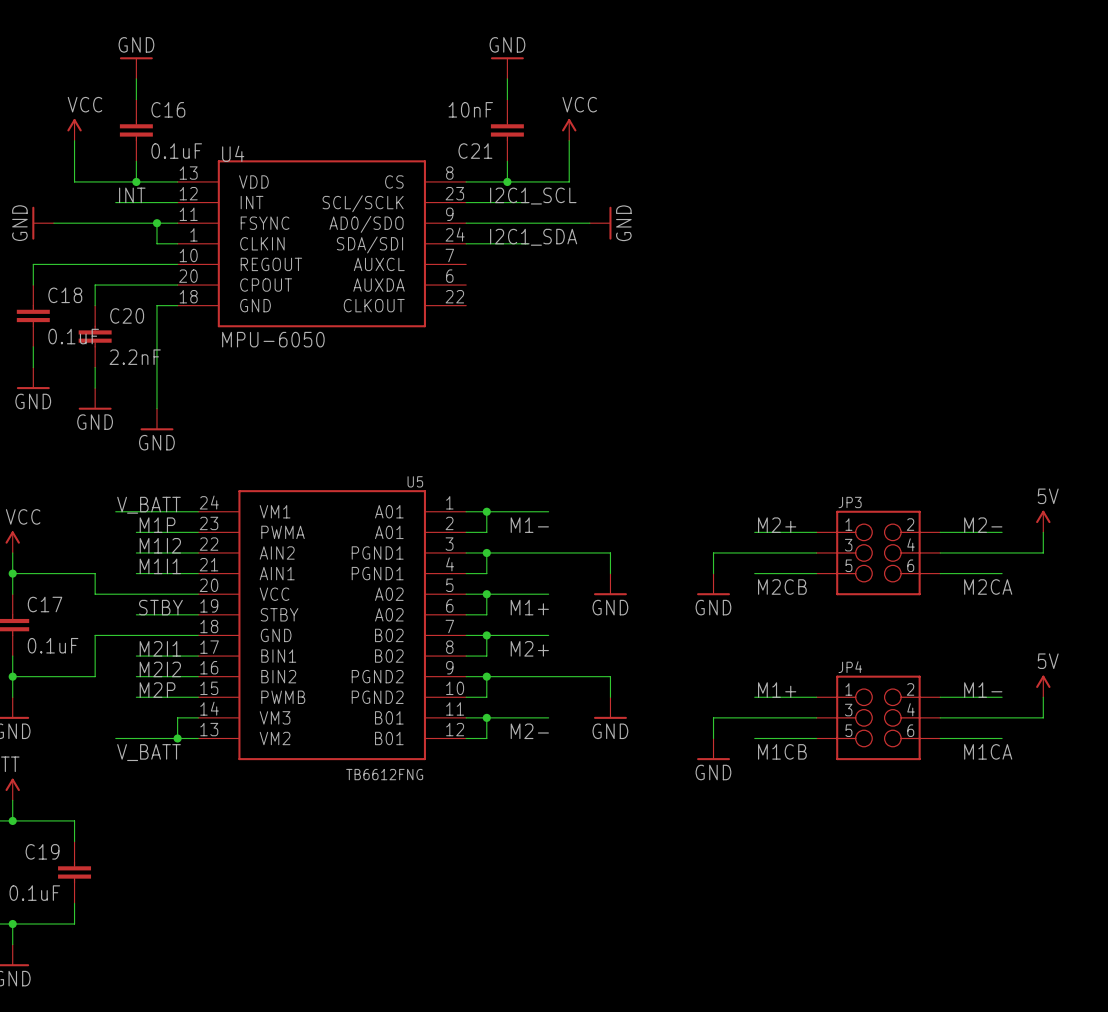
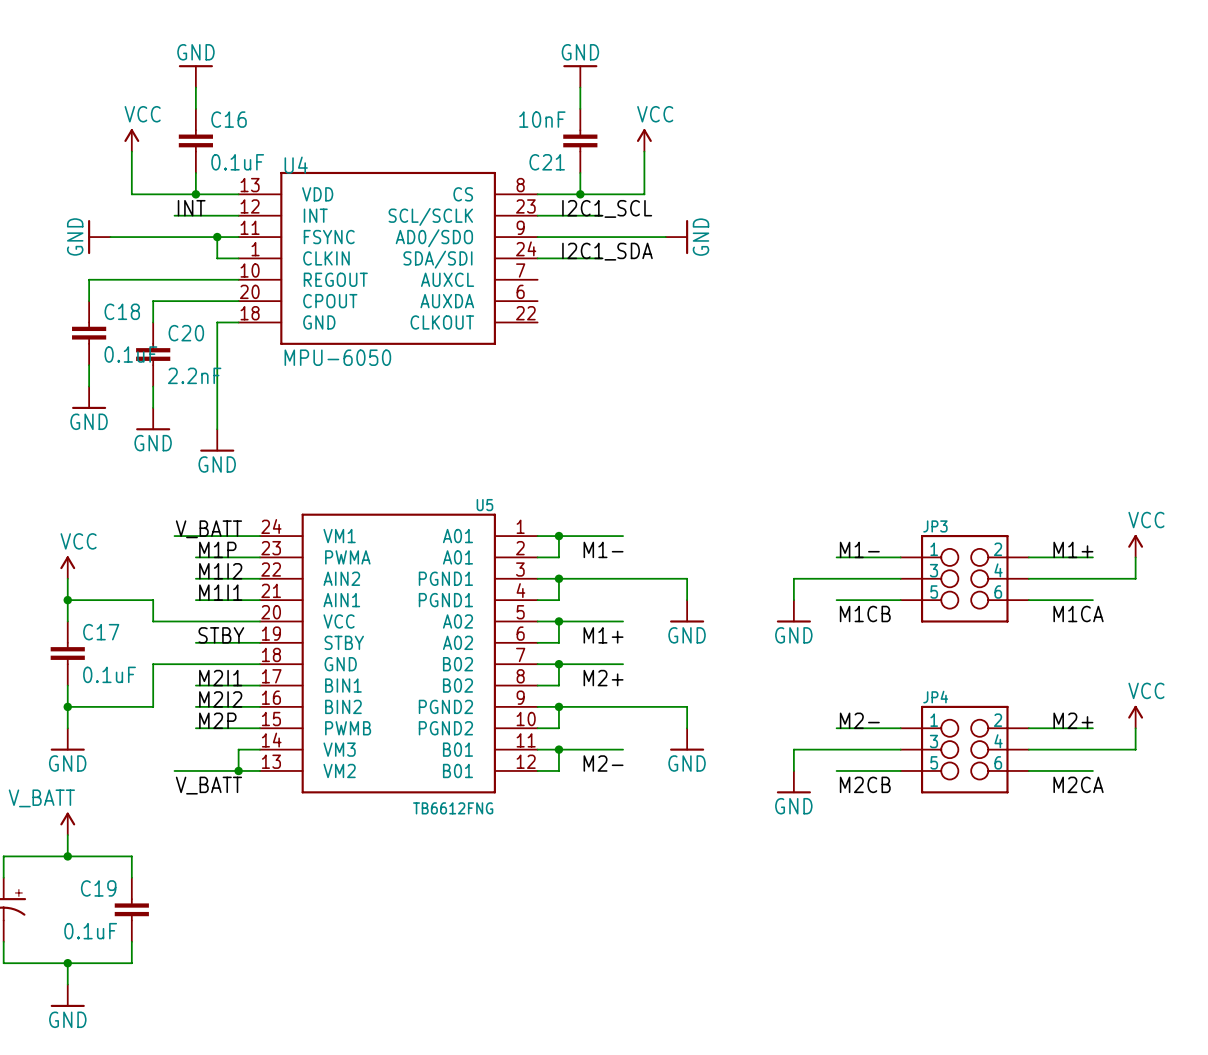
power symbol: 5V (1043, 521) -> VCC (1135, 546)
label: M2+ (777, 525) -> M1- (859, 549)
label: M2- (983, 525) -> M1+ (1073, 549)
label: M2CB (782, 586) -> M1CB (865, 614)
label: M2CA (988, 586) -> M1CA (1078, 614)
power symbol: 5V (1043, 686) -> VCC (1135, 717)
label: M1+ (777, 690) -> M2- (859, 720)
label: M1- (983, 690) -> M2+ (1073, 720)
label: M1CB (782, 751) -> M2CB (865, 784)
label: M1CA (988, 751) -> M2CA (1078, 784)

